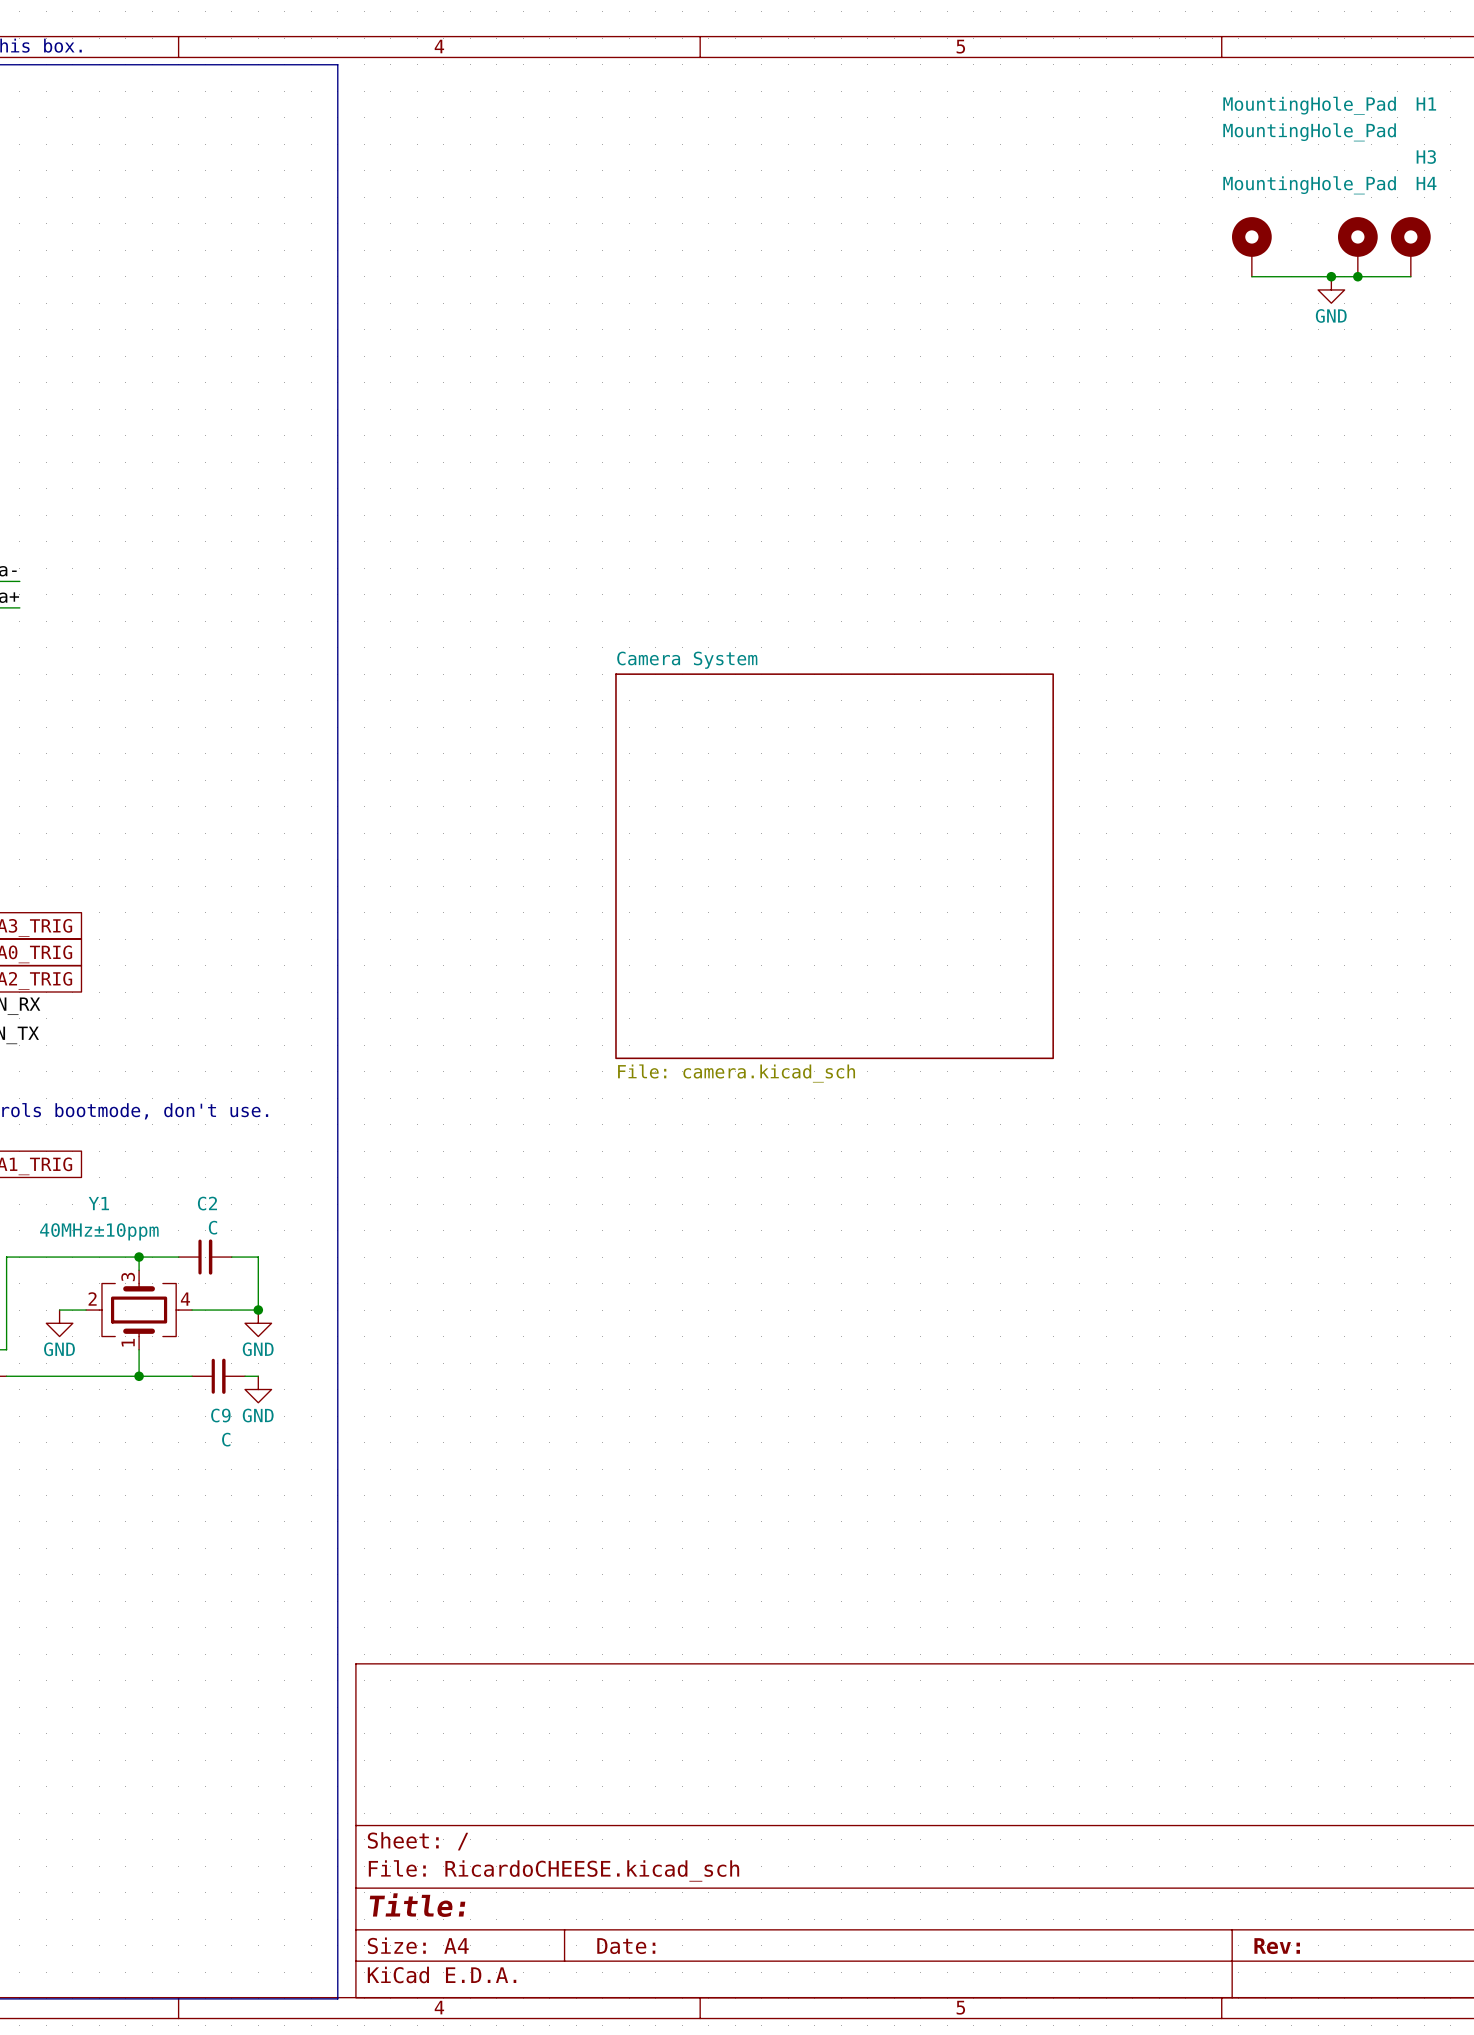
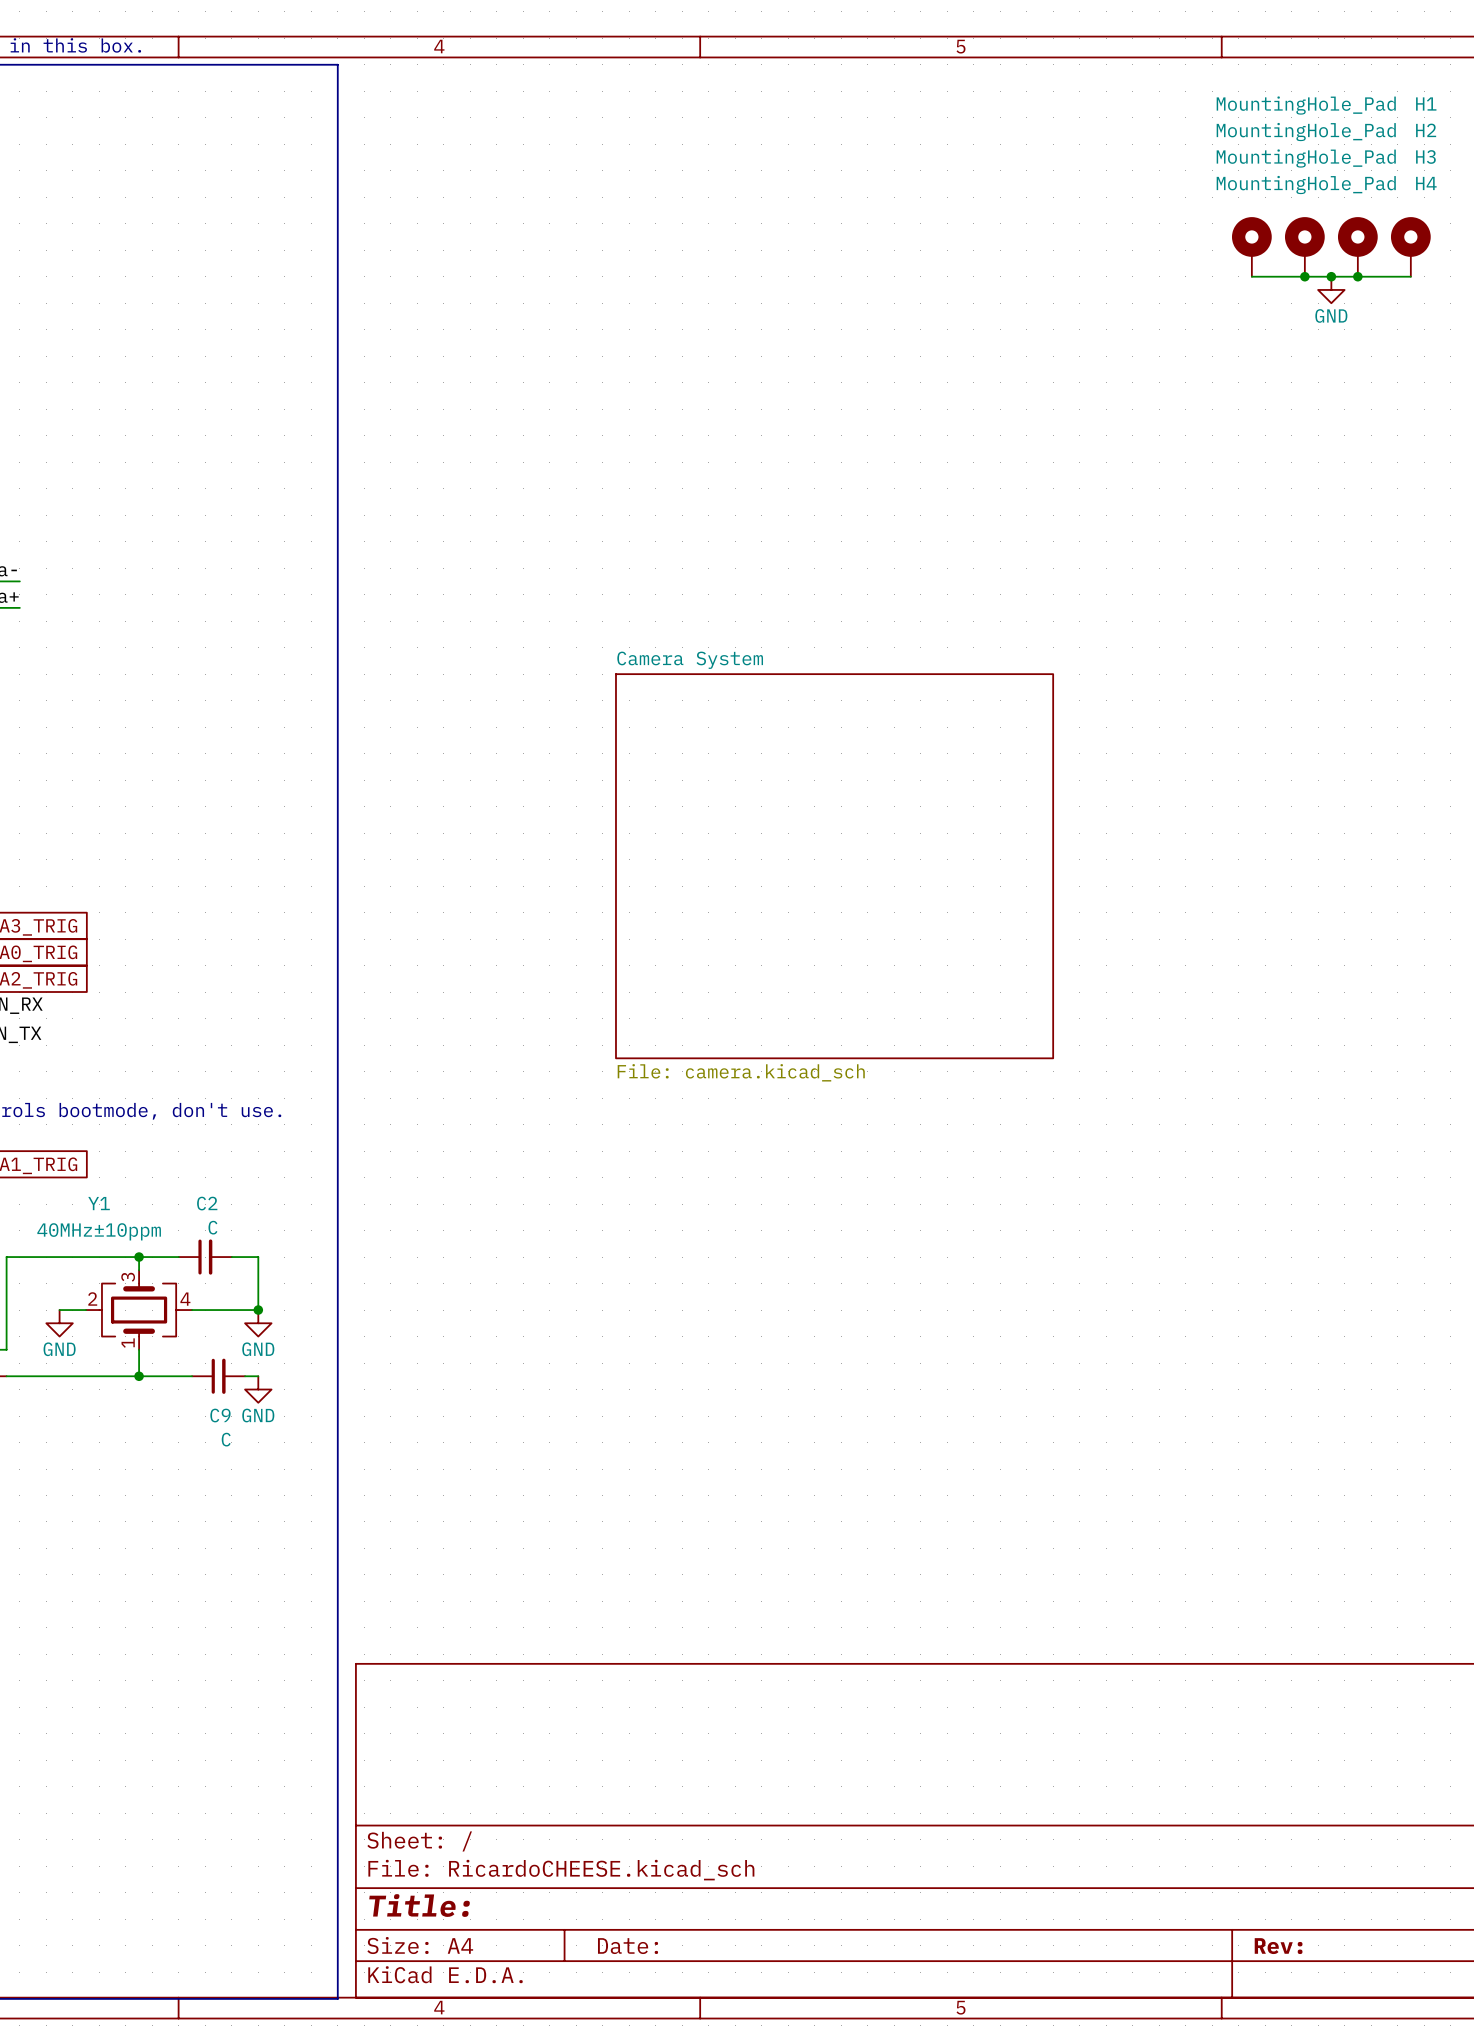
H2: none -> MountingHole_Pad (1304, 246)
junction: none -> (1304, 276)

